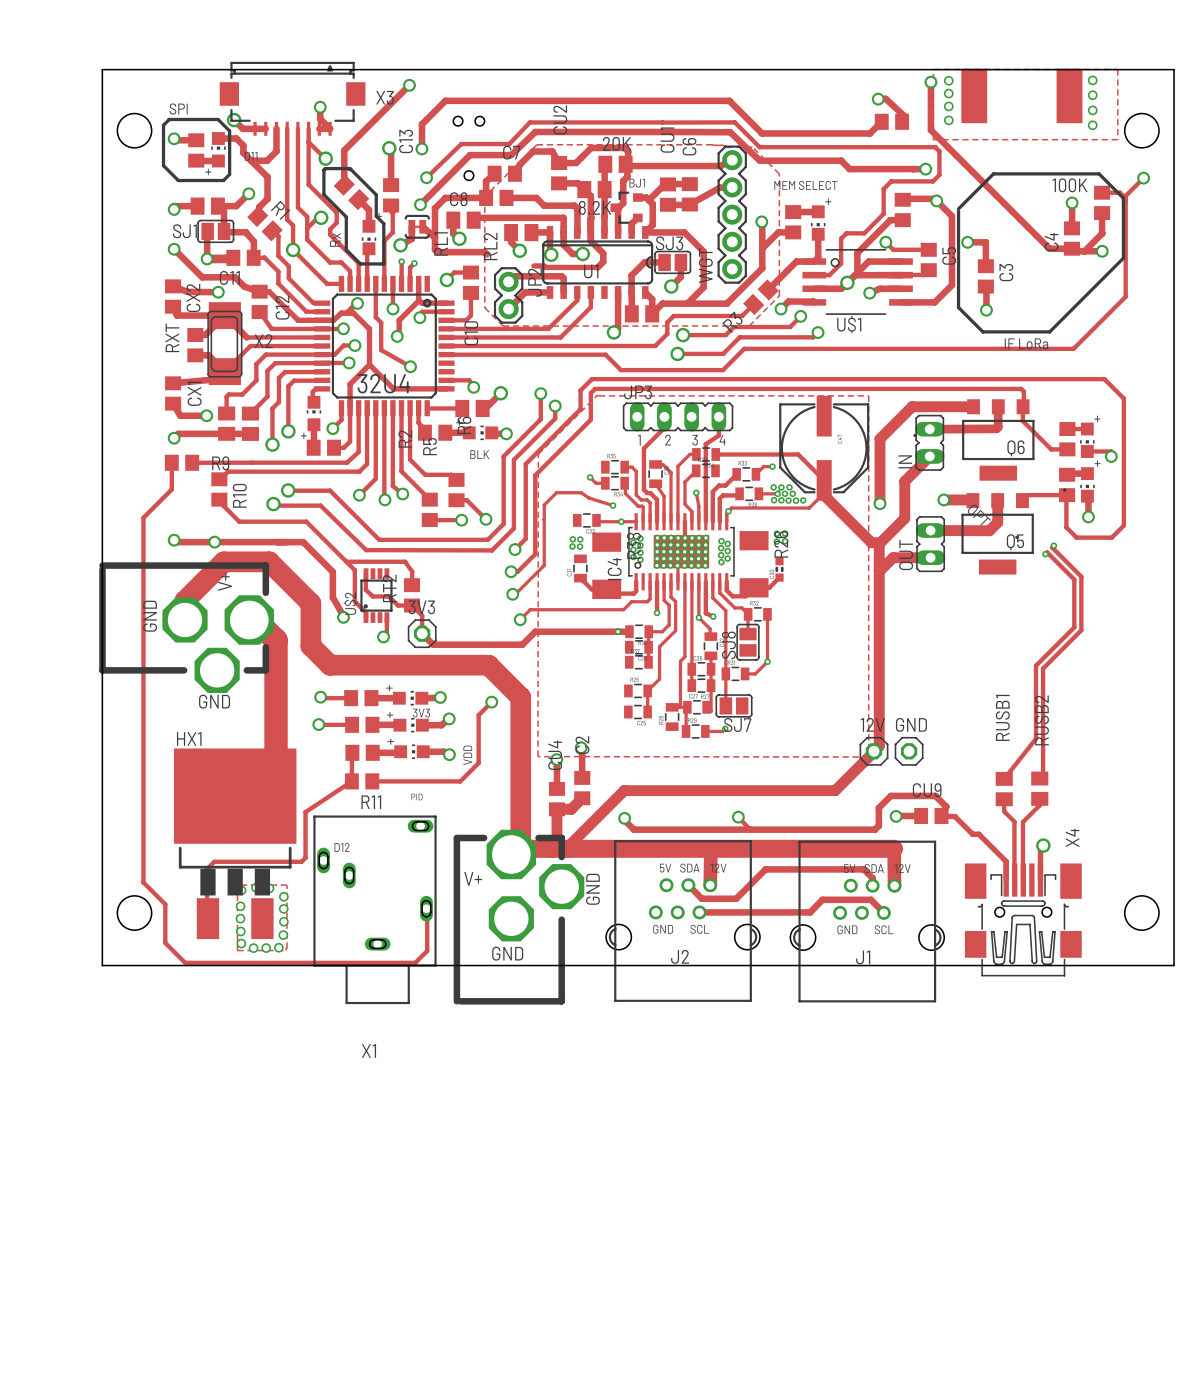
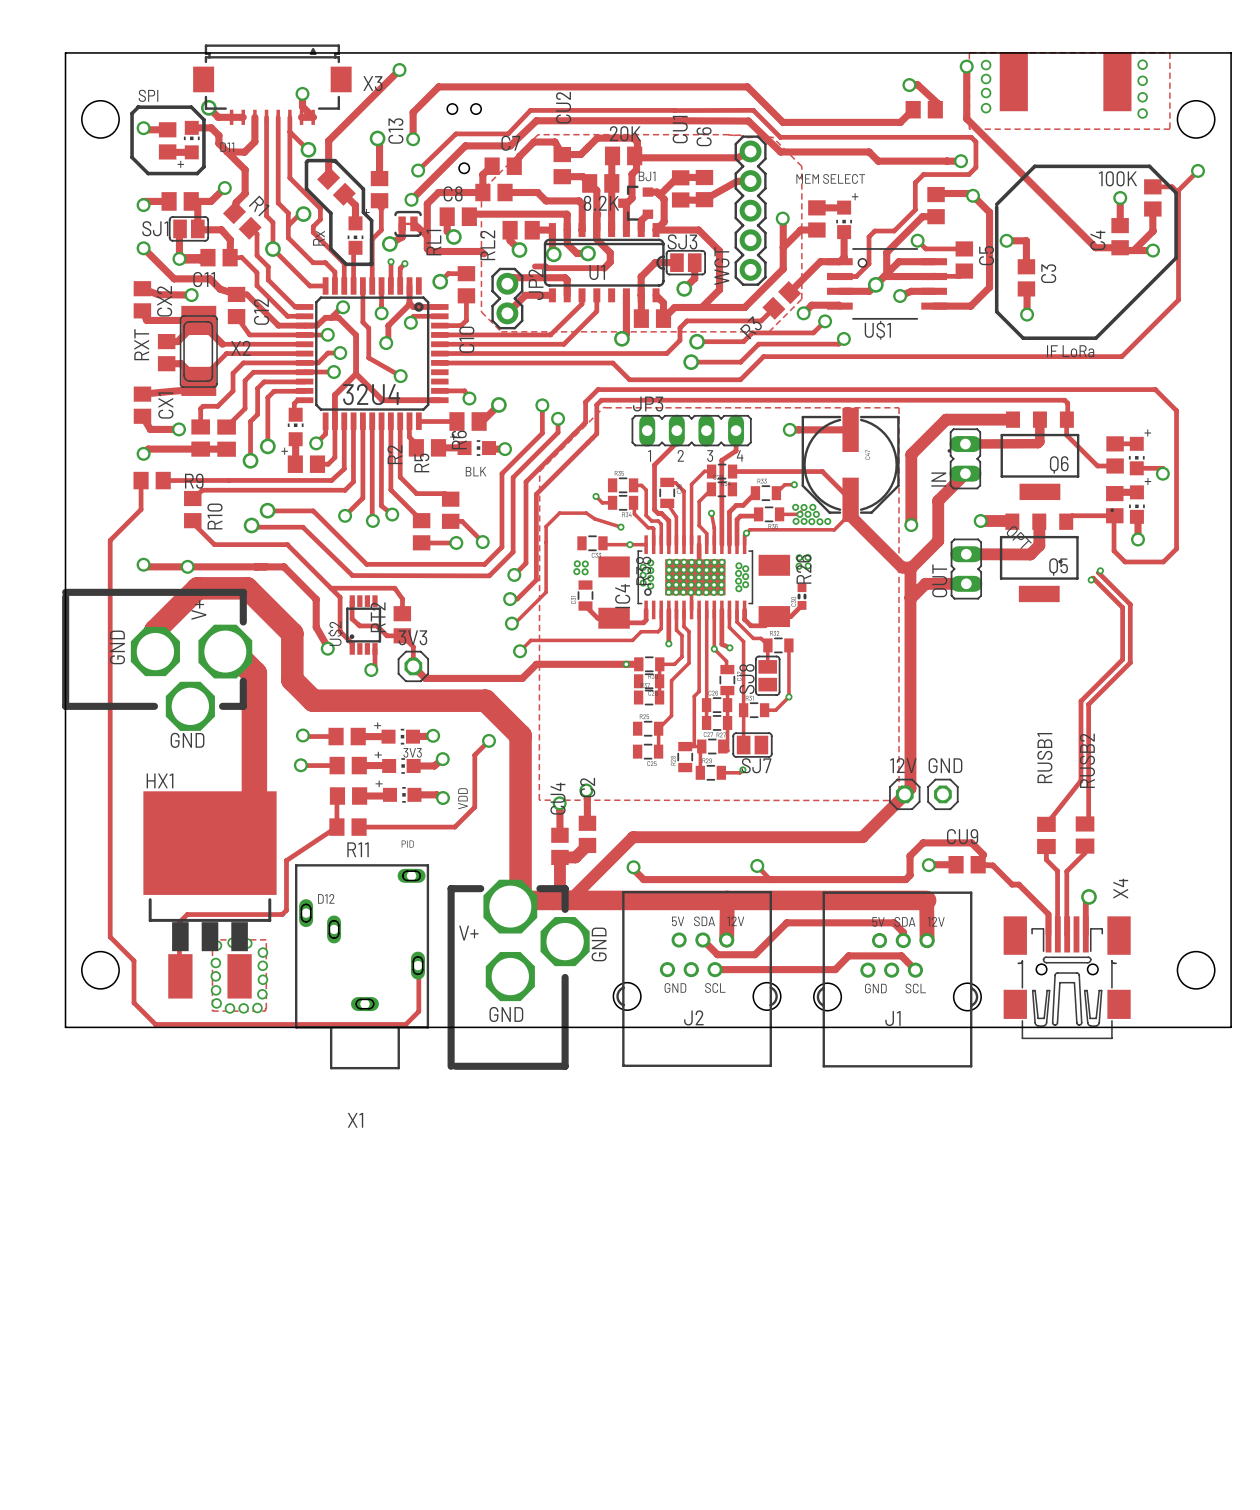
track: none -> (789, 429) (850, 429)
via: none -> (789, 429)

